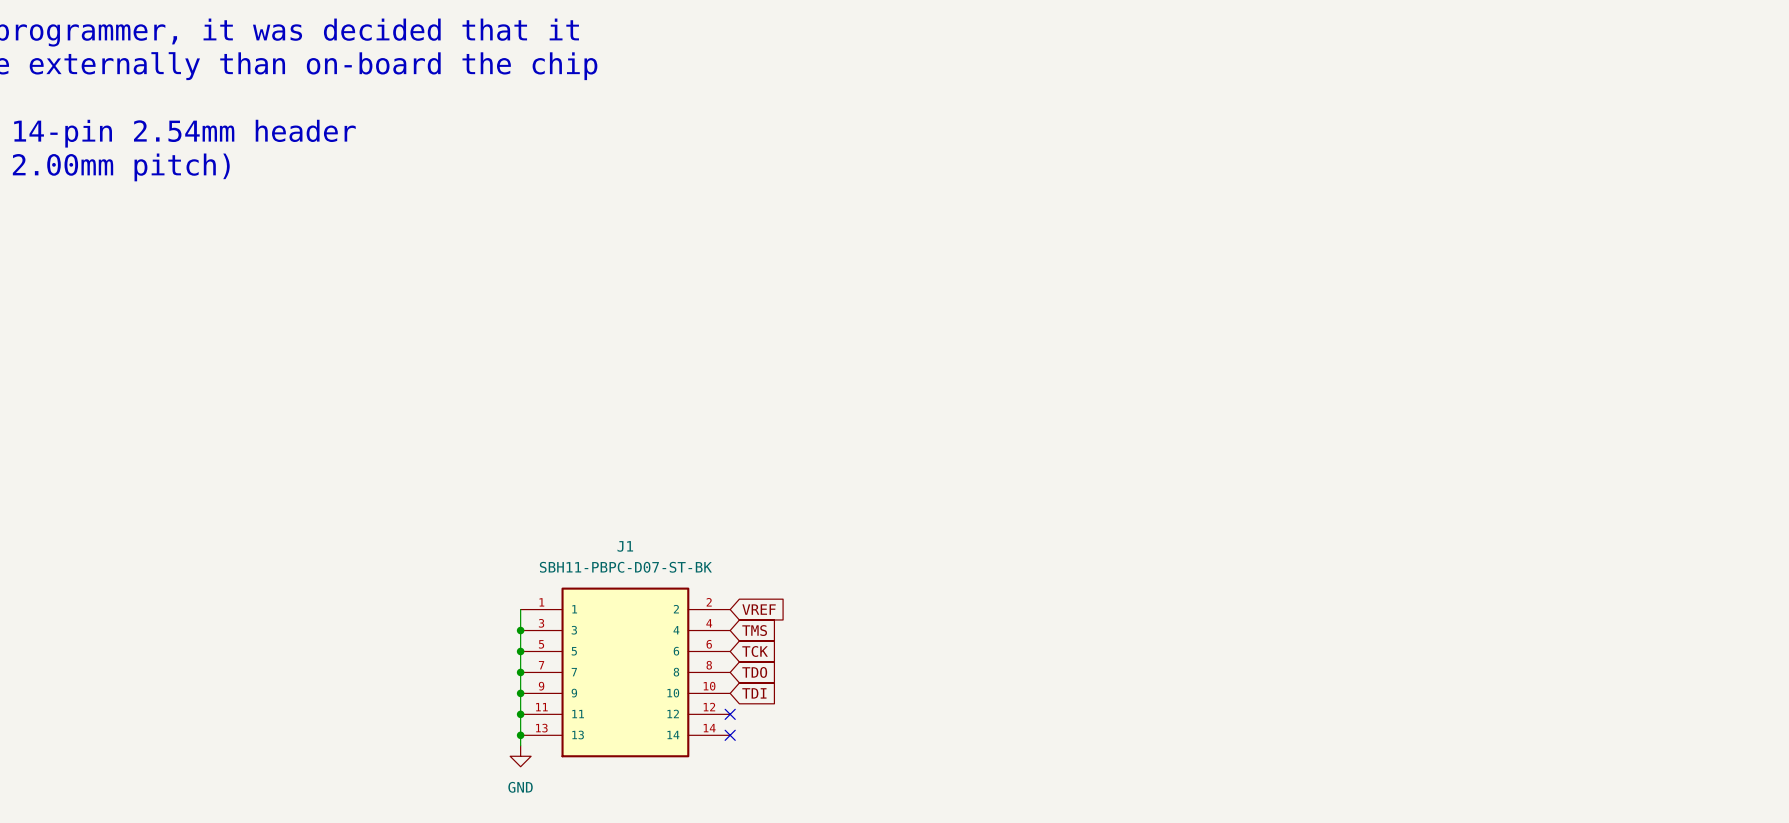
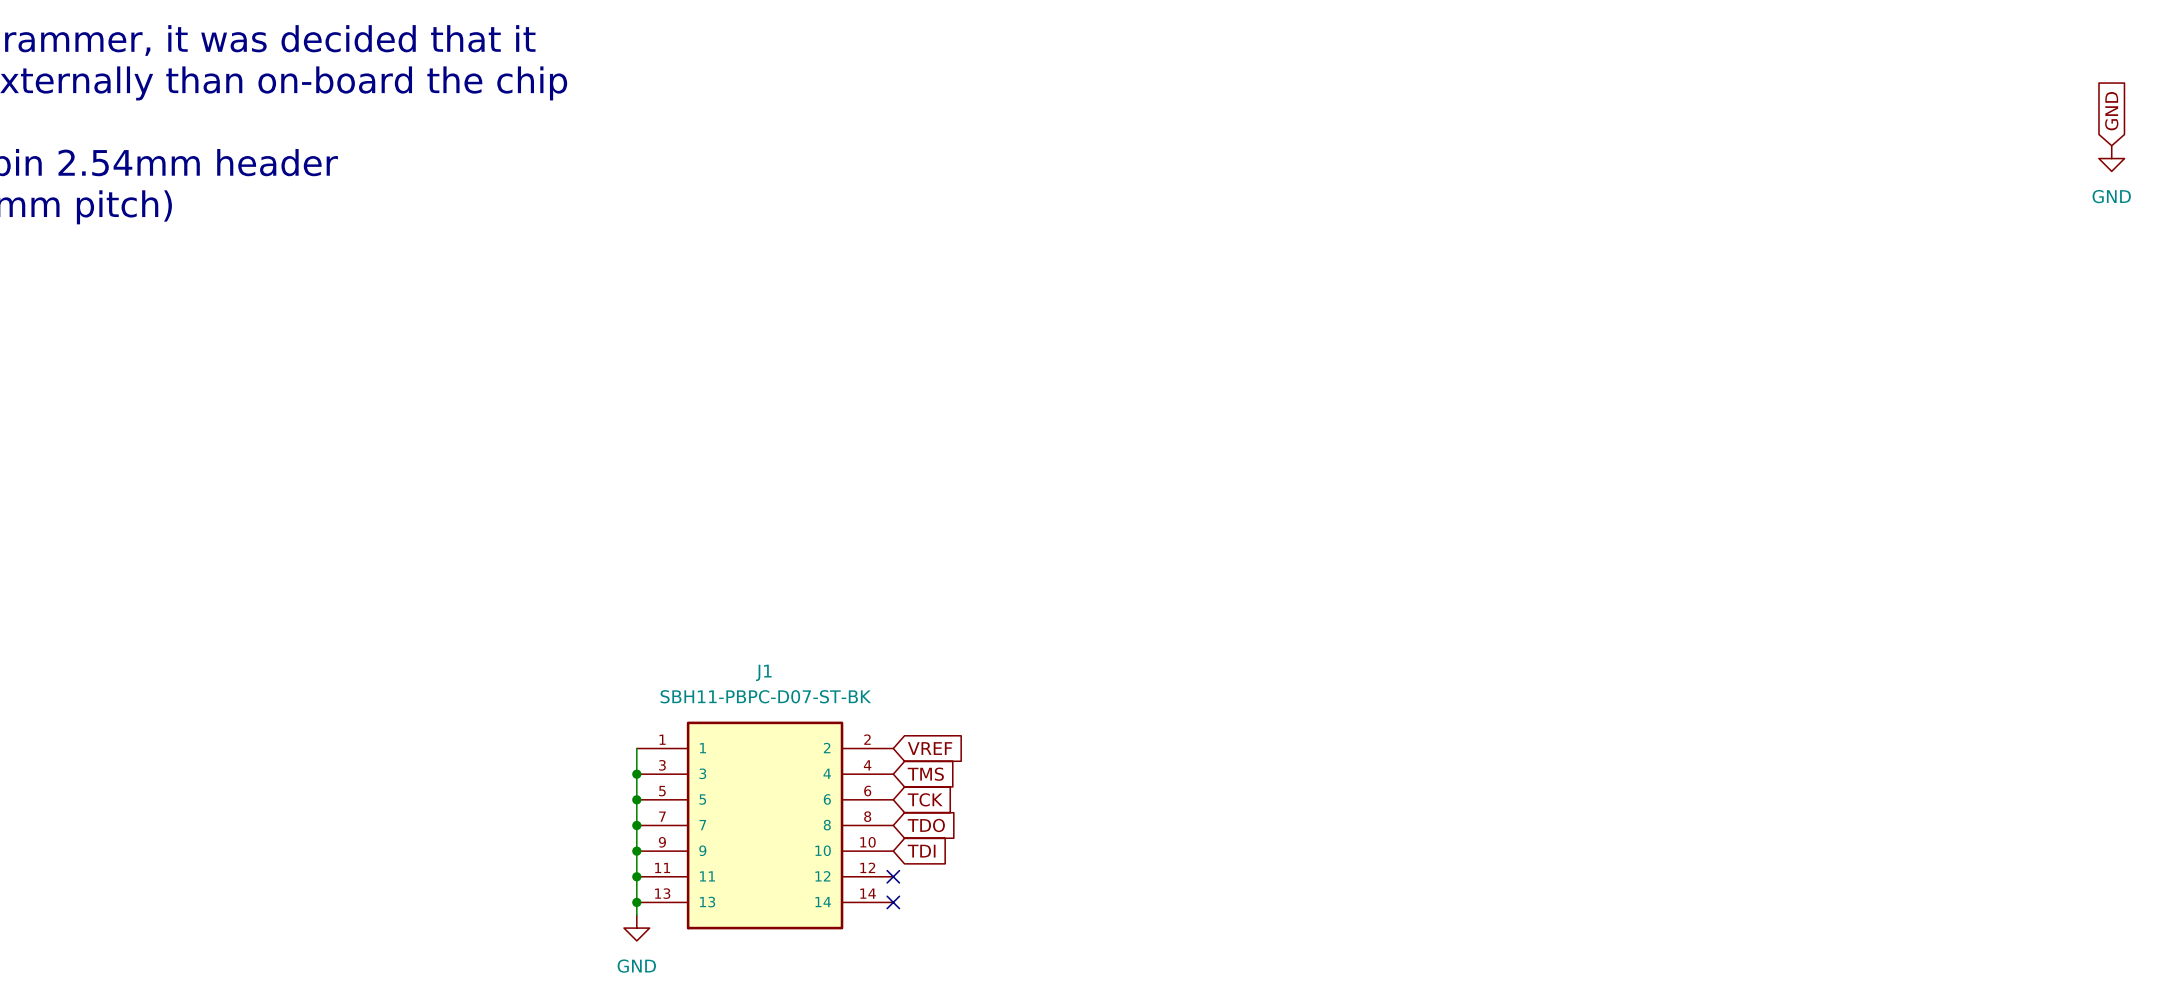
global label: none -> GND (2111, 111)
power symbol: none -> GND (2111, 158)

